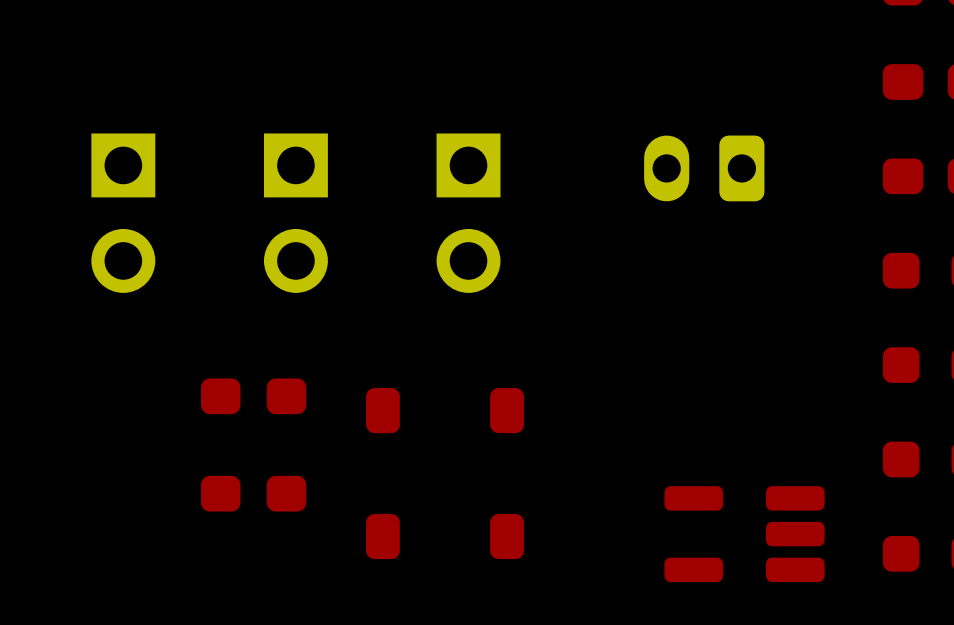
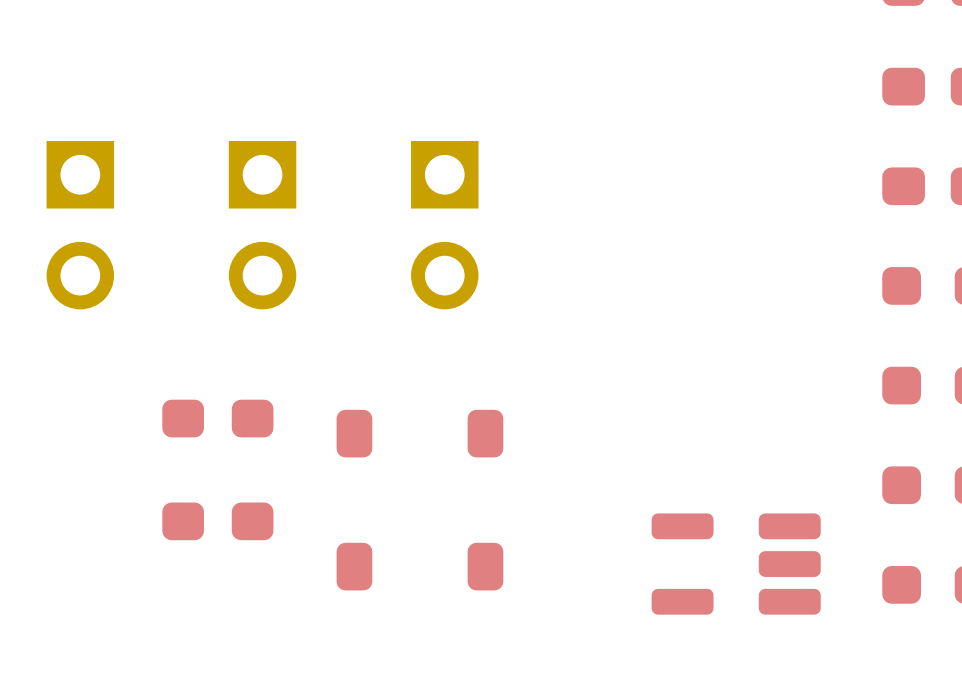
part: (704, 168) -> none

